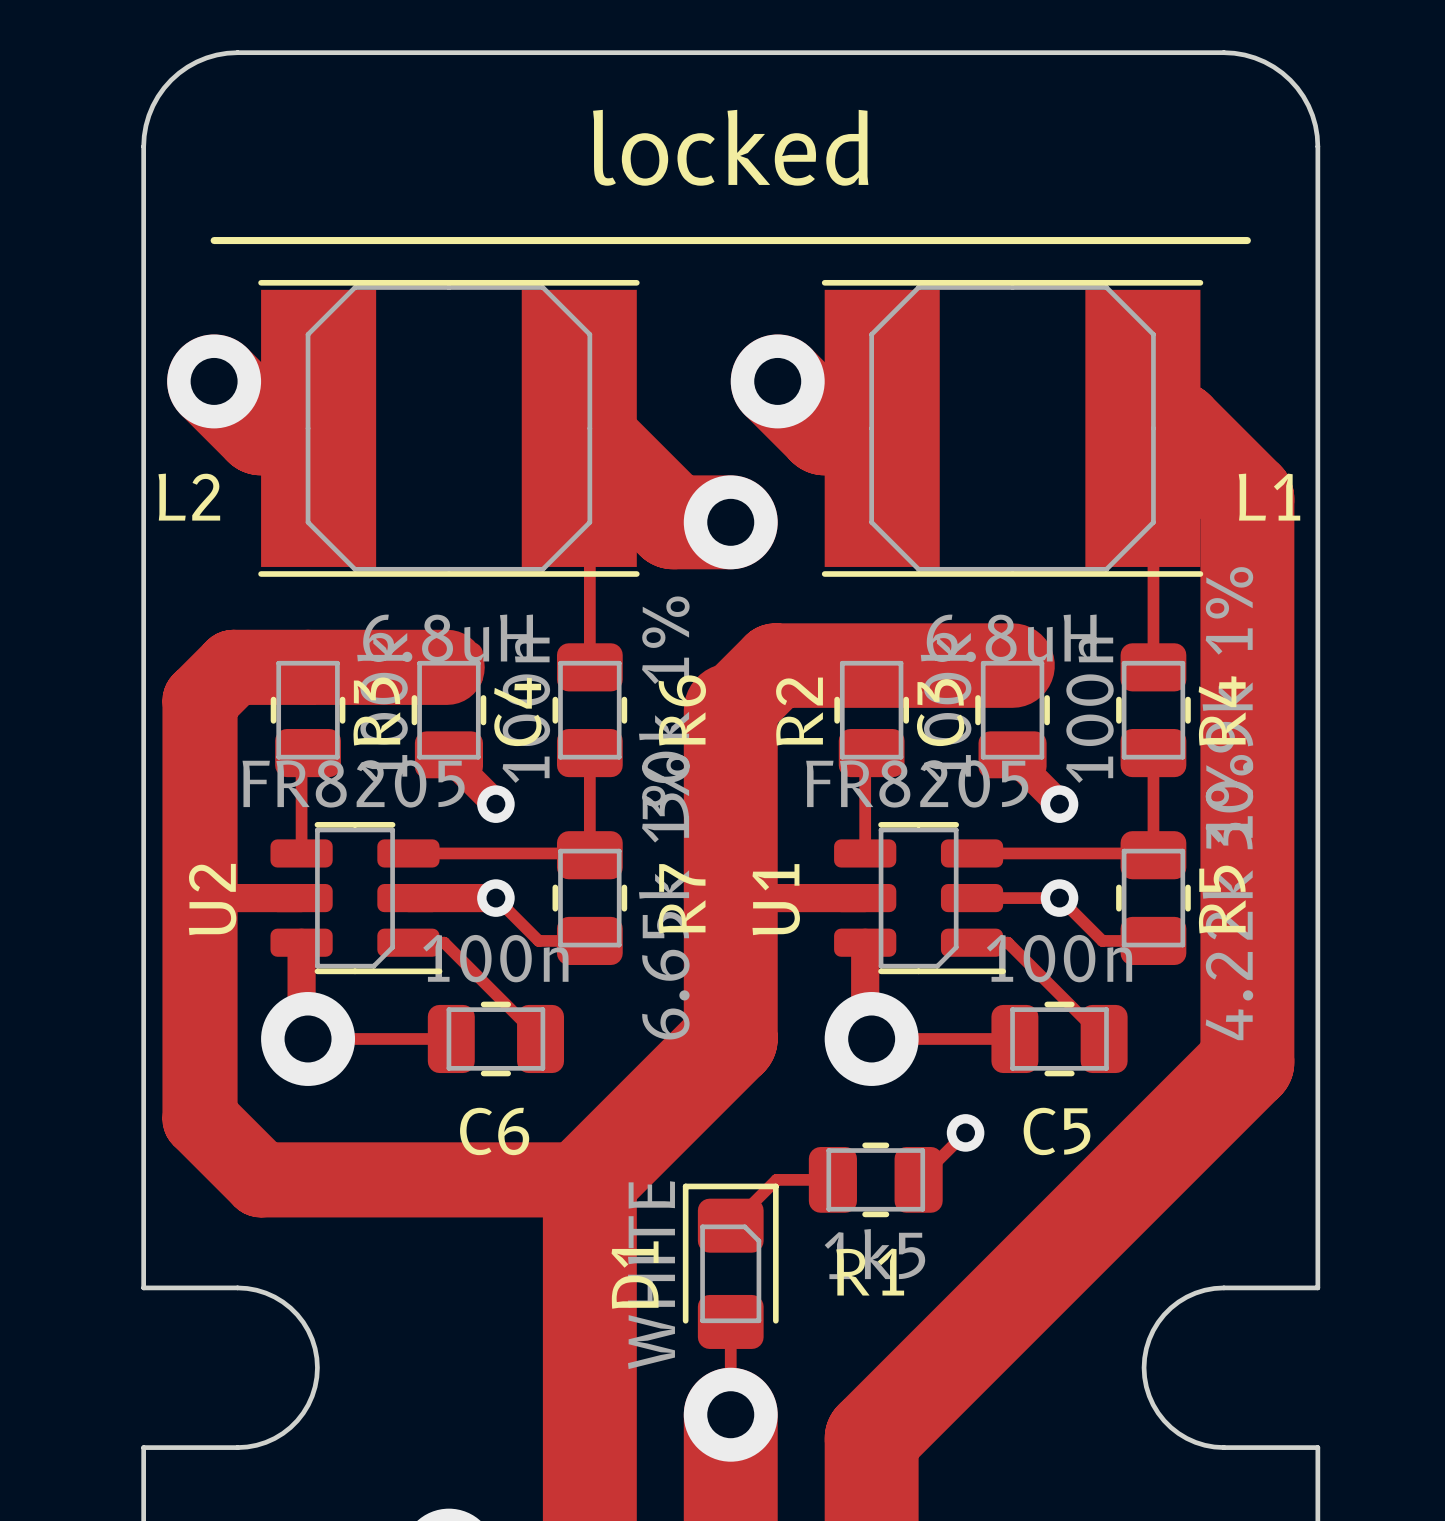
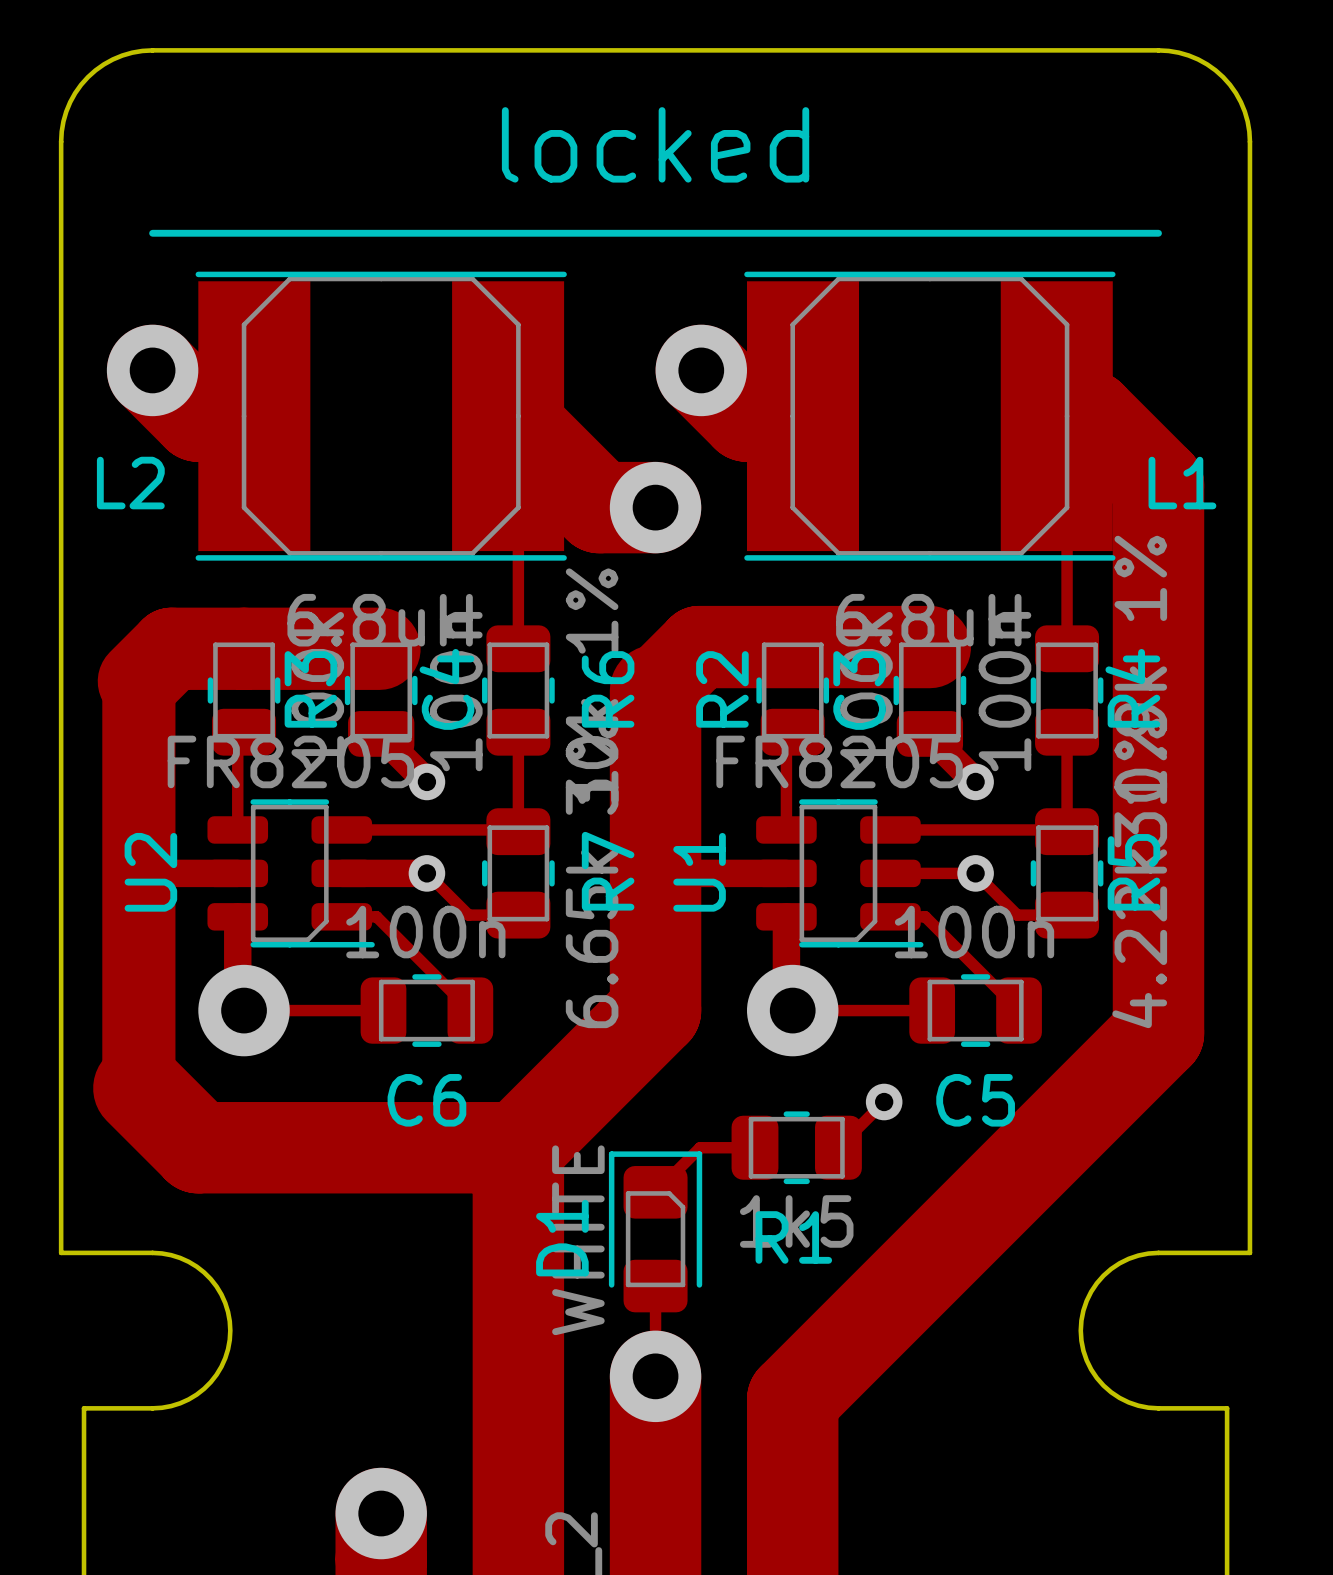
board edge: (237, 52) (206, 57) (179, 73) (164, 88) (152, 105) (144, 136) (143, 1287) -> (175, 50) (132, 52) (112, 59) (95, 70) (81, 84) (70, 102) (61, 131) (61, 1252) (84, 1252)
board edge: (1223, 52) (1254, 57) (1282, 73) (1297, 88) (1308, 105) (1317, 136) (1317, 1287) -> (1135, 50) (1178, 52) (1198, 59) (1215, 70) (1230, 84) (1240, 102) (1249, 131) (1249, 1252) (1227, 1252)
track width: thin (447, 667) (233, 667) (200, 700) -> thick (379, 648) (171, 648) (138, 681)
track width: thin (200, 1118) (261, 1179) (589, 1179) -> thick (138, 1088) (198, 1147) (518, 1147)
board edge: (214, 1287) (256, 1290) (282, 1302) (297, 1314) (308, 1330) (315, 1348) (317, 1367) (315, 1386) (308, 1404) (297, 1420) (282, 1433) (256, 1445) (214, 1447) -> (152, 1252) (180, 1257) (196, 1266) (210, 1279) (225, 1303) (230, 1330) (225, 1358) (216, 1374) (204, 1388) (180, 1403) (152, 1408)
board edge: (1247, 1287) (1204, 1290) (1178, 1302) (1164, 1314) (1153, 1330) (1146, 1348) (1144, 1367) (1146, 1386) (1153, 1404) (1164, 1420) (1178, 1433) (1204, 1445) (1247, 1447) -> (1158, 1252) (1128, 1258) (1103, 1275) (1086, 1300) (1080, 1330) (1086, 1360) (1103, 1385) (1128, 1402) (1158, 1408)

